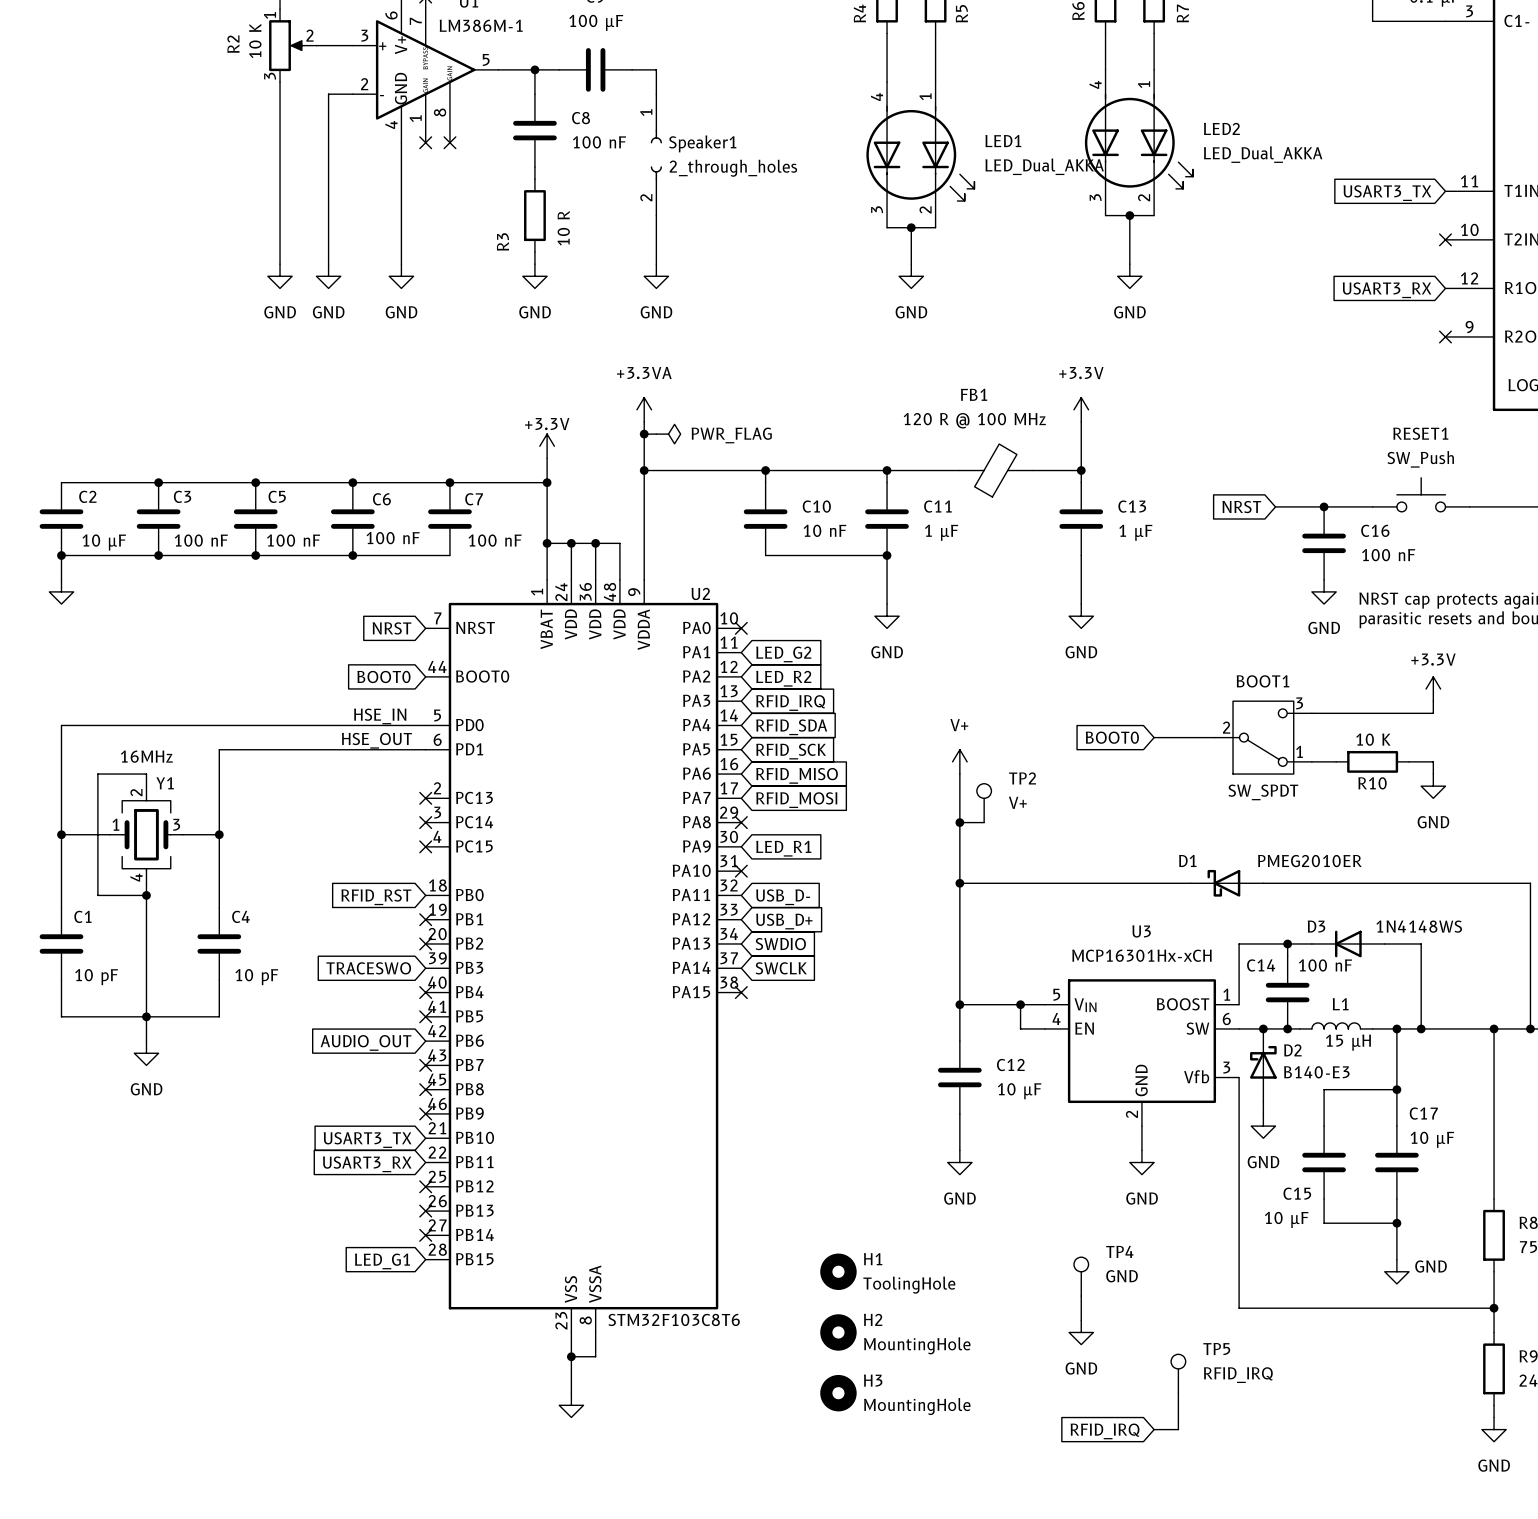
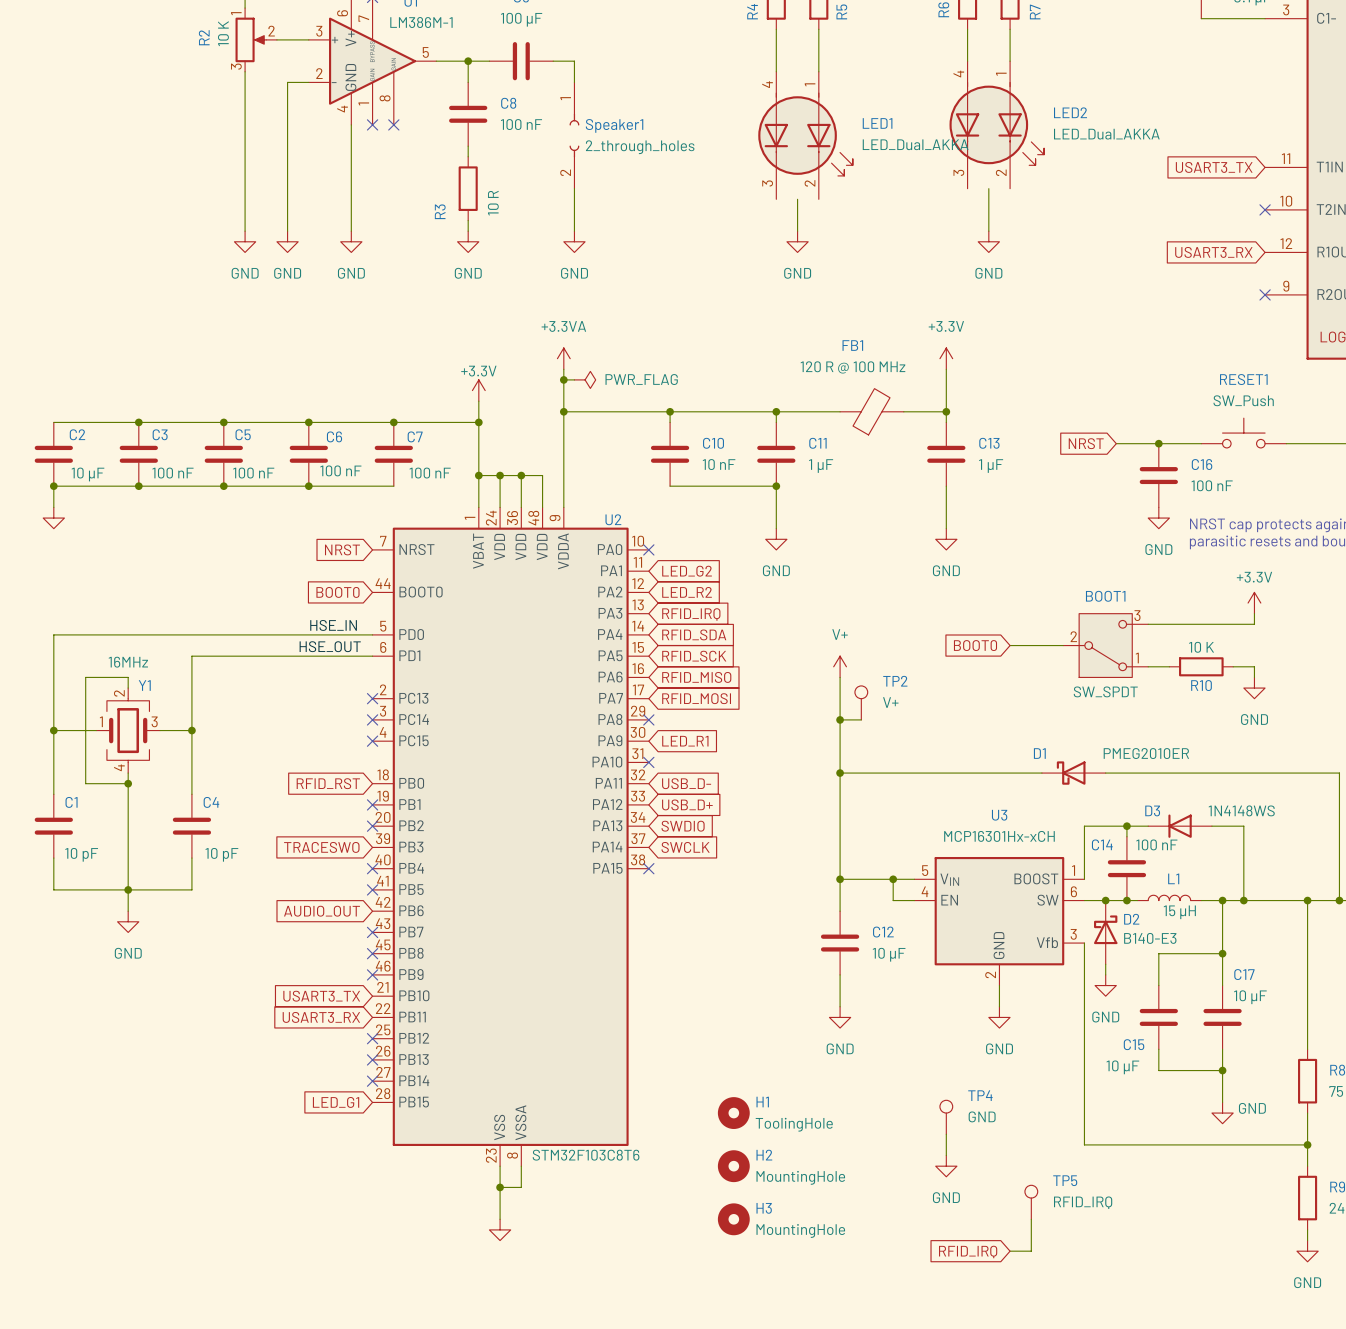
wire: (1105, 215) (1154, 215) -> none
junction: (1129, 215) -> none
wire: (887, 227) (935, 227) -> none
junction: (911, 227) -> none

